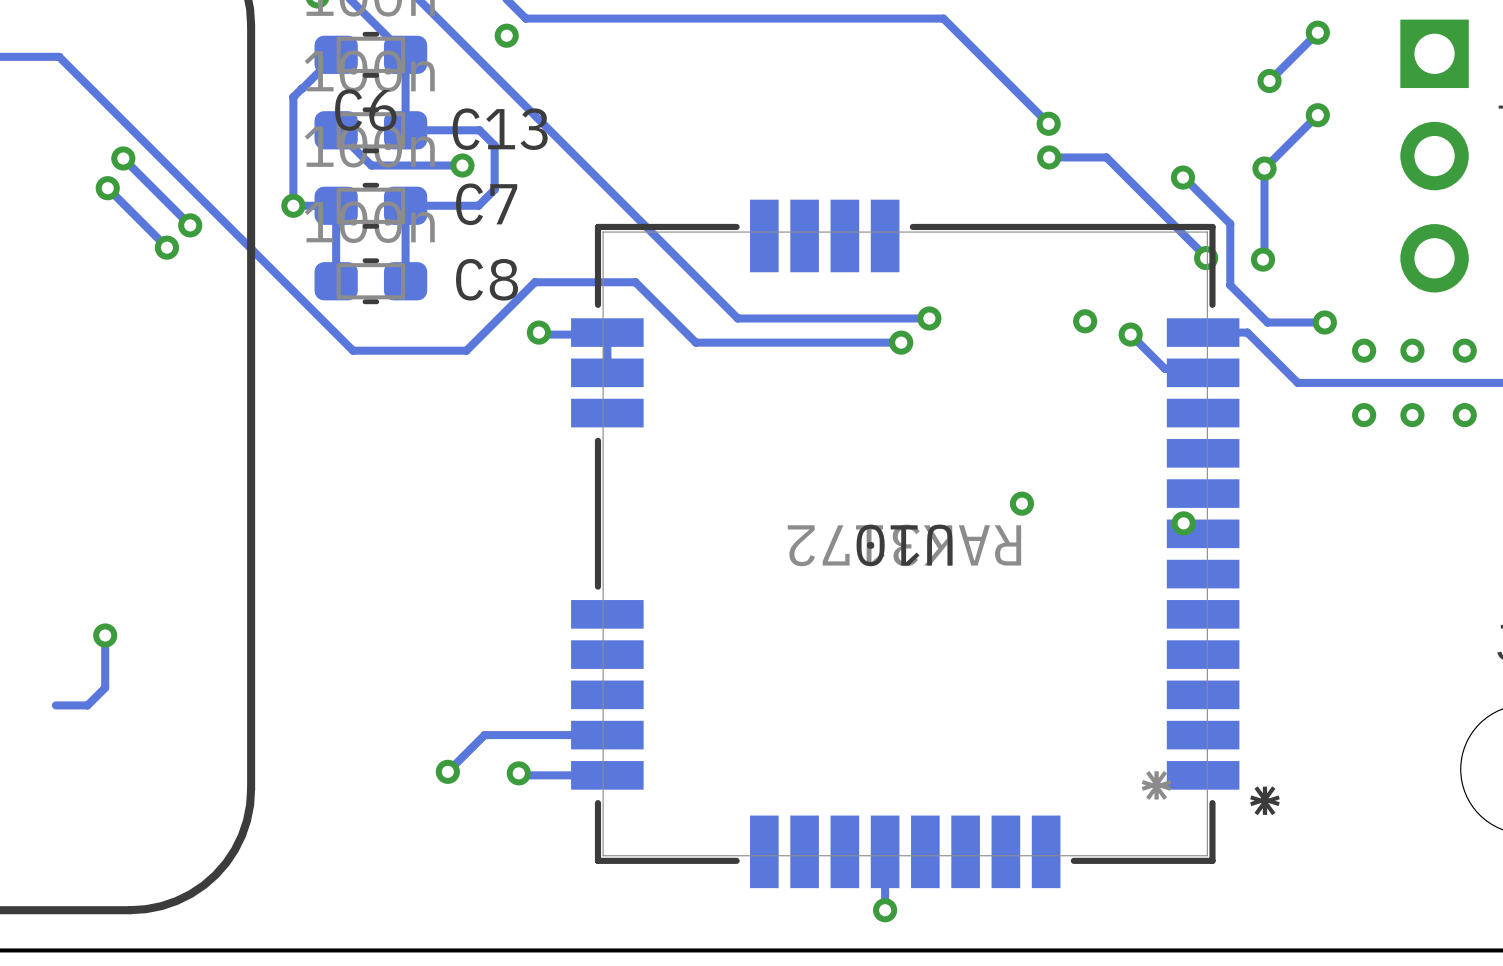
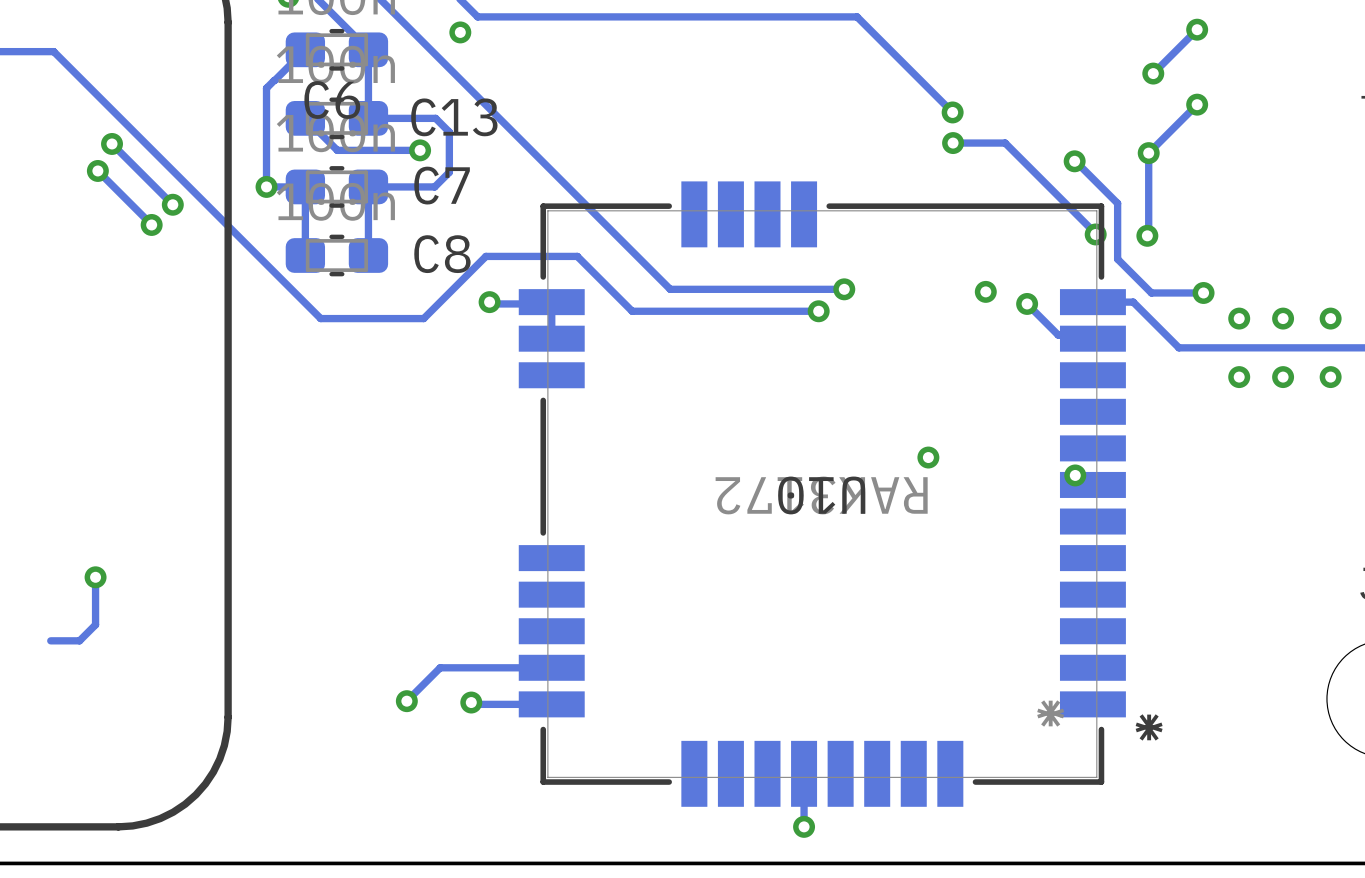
part: (1434, 156) -> none

